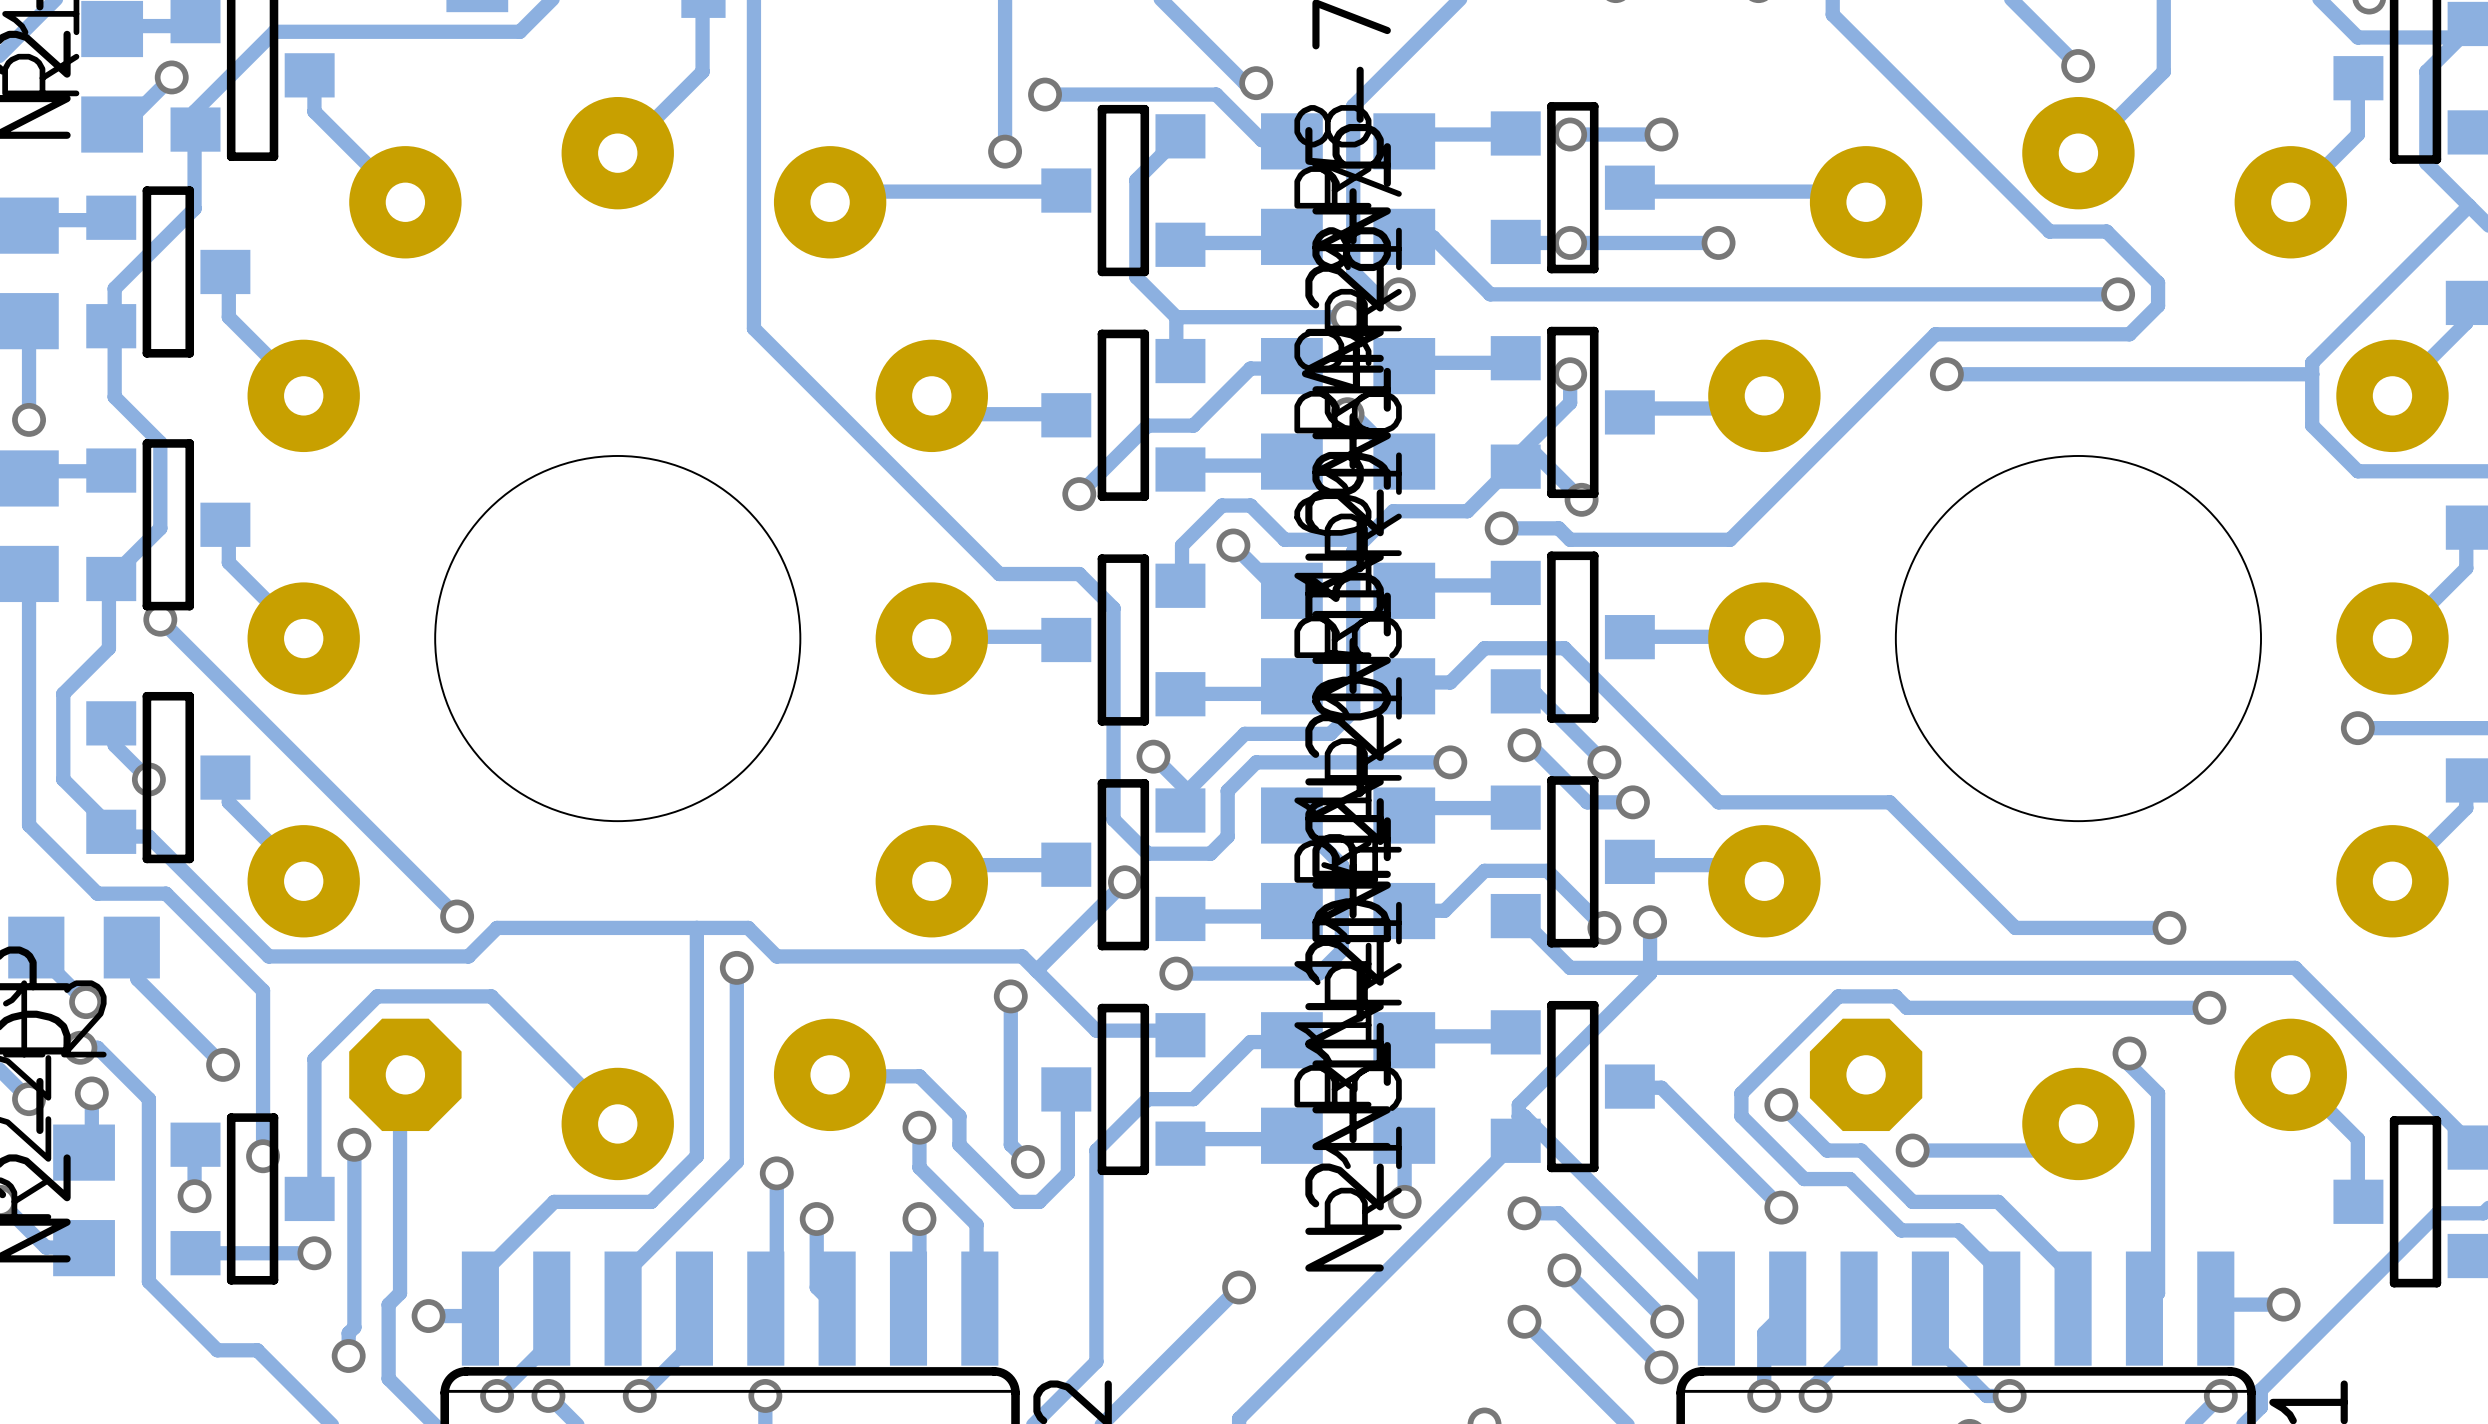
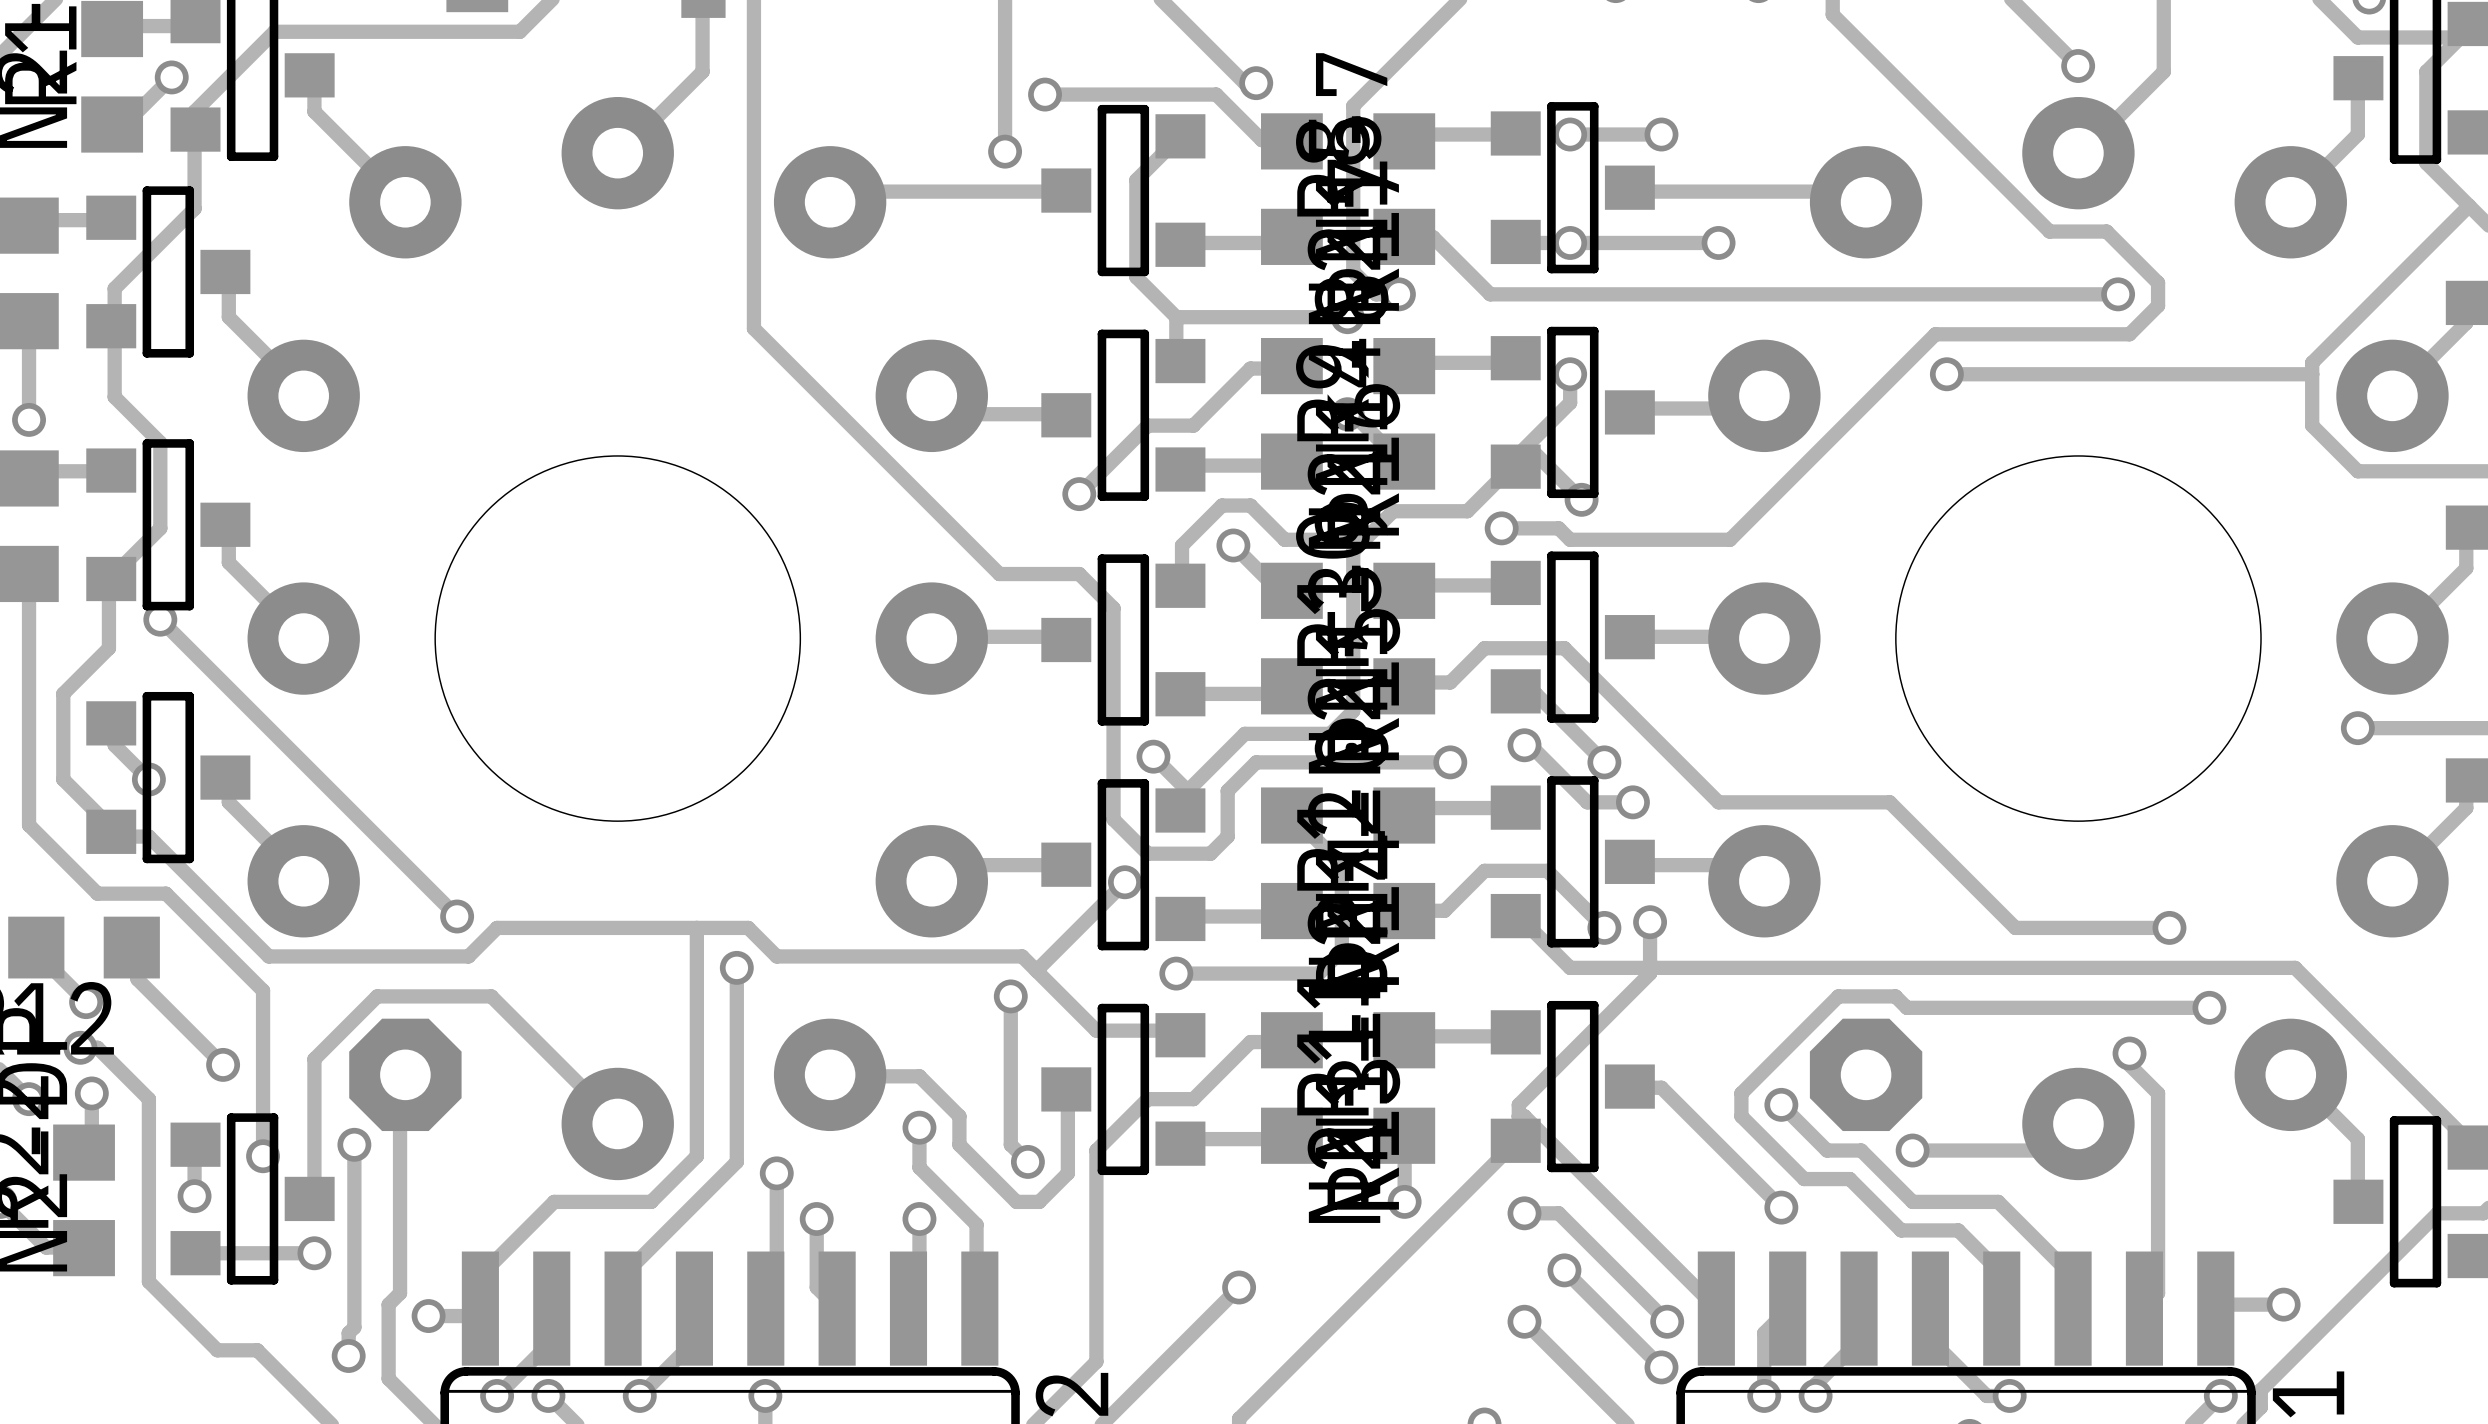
part footprint: [247, 96, 988, 1181] -> [247, 96, 988, 1181]
part footprint: [1708, 96, 2449, 1181] -> [1708, 96, 2449, 1181]

